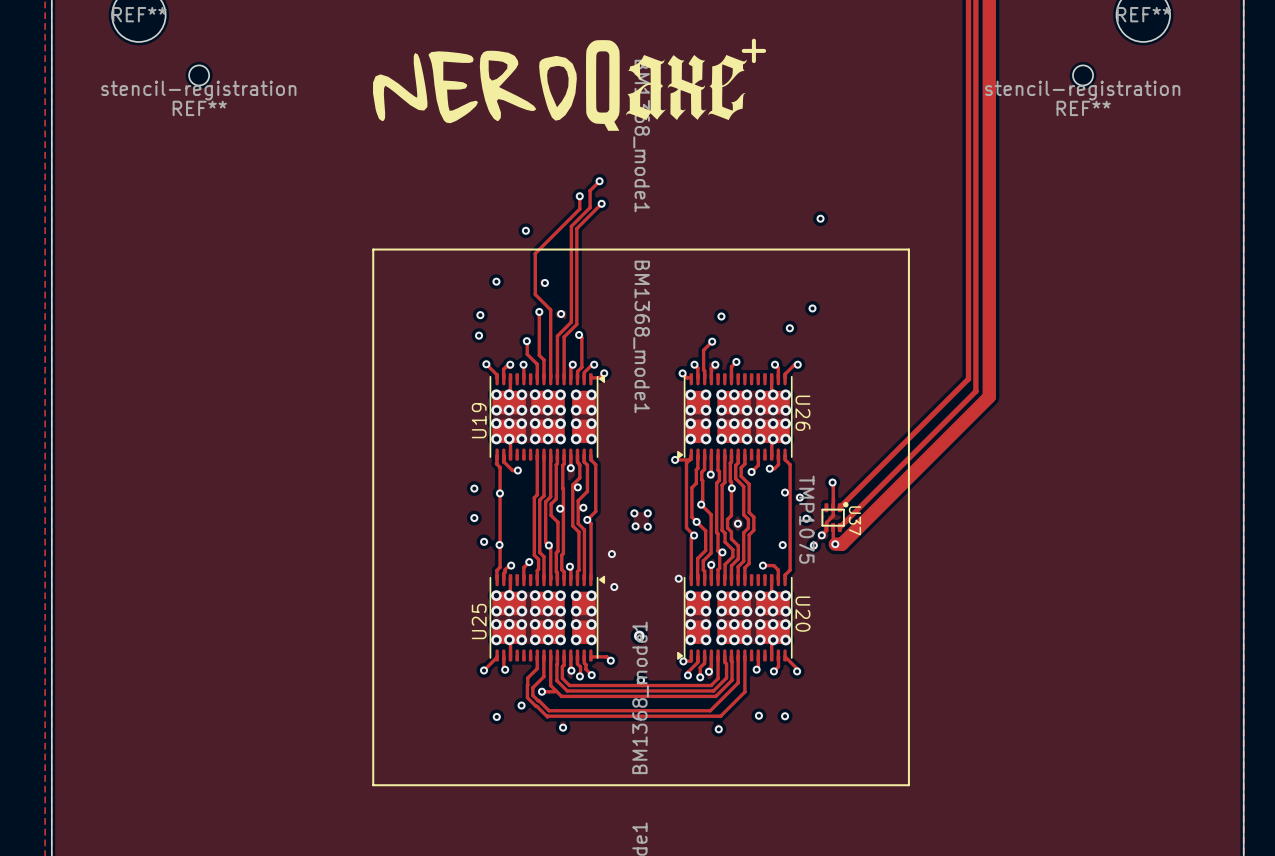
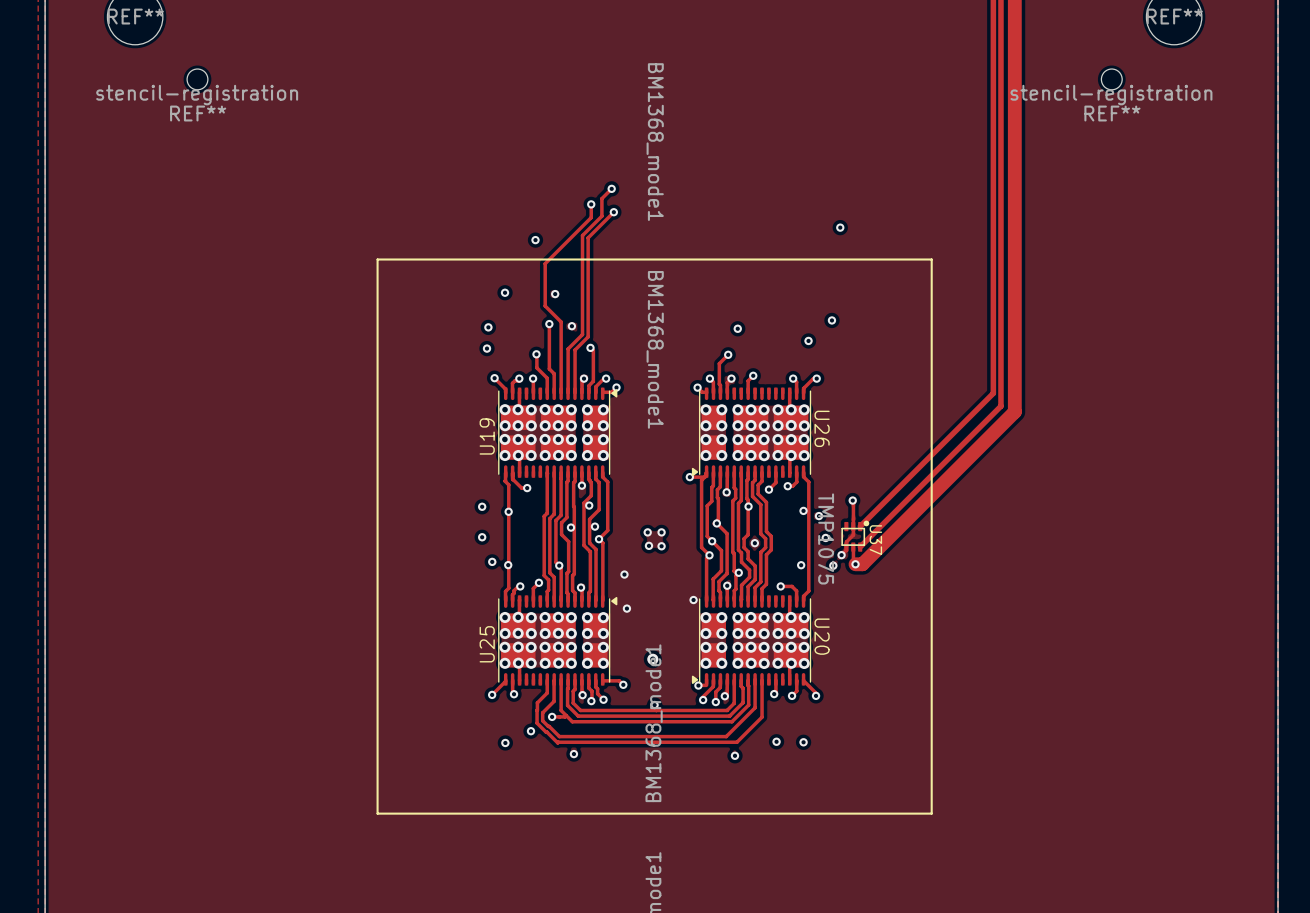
drawing: [373, 40, 747, 131] -> none
text: + (753, 50) -> none

